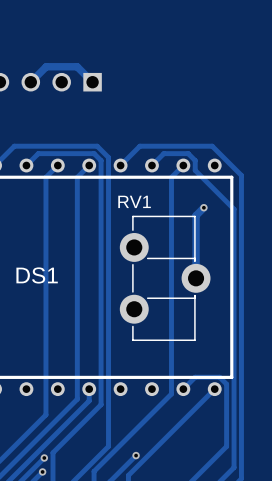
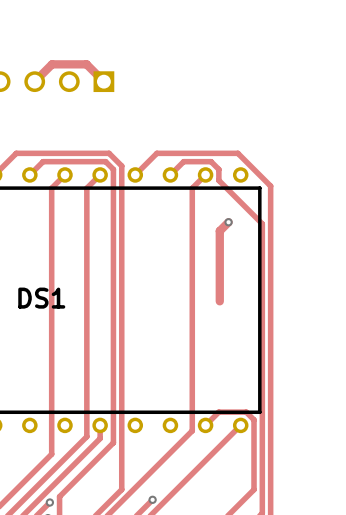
RV1: (165, 278) -> none

